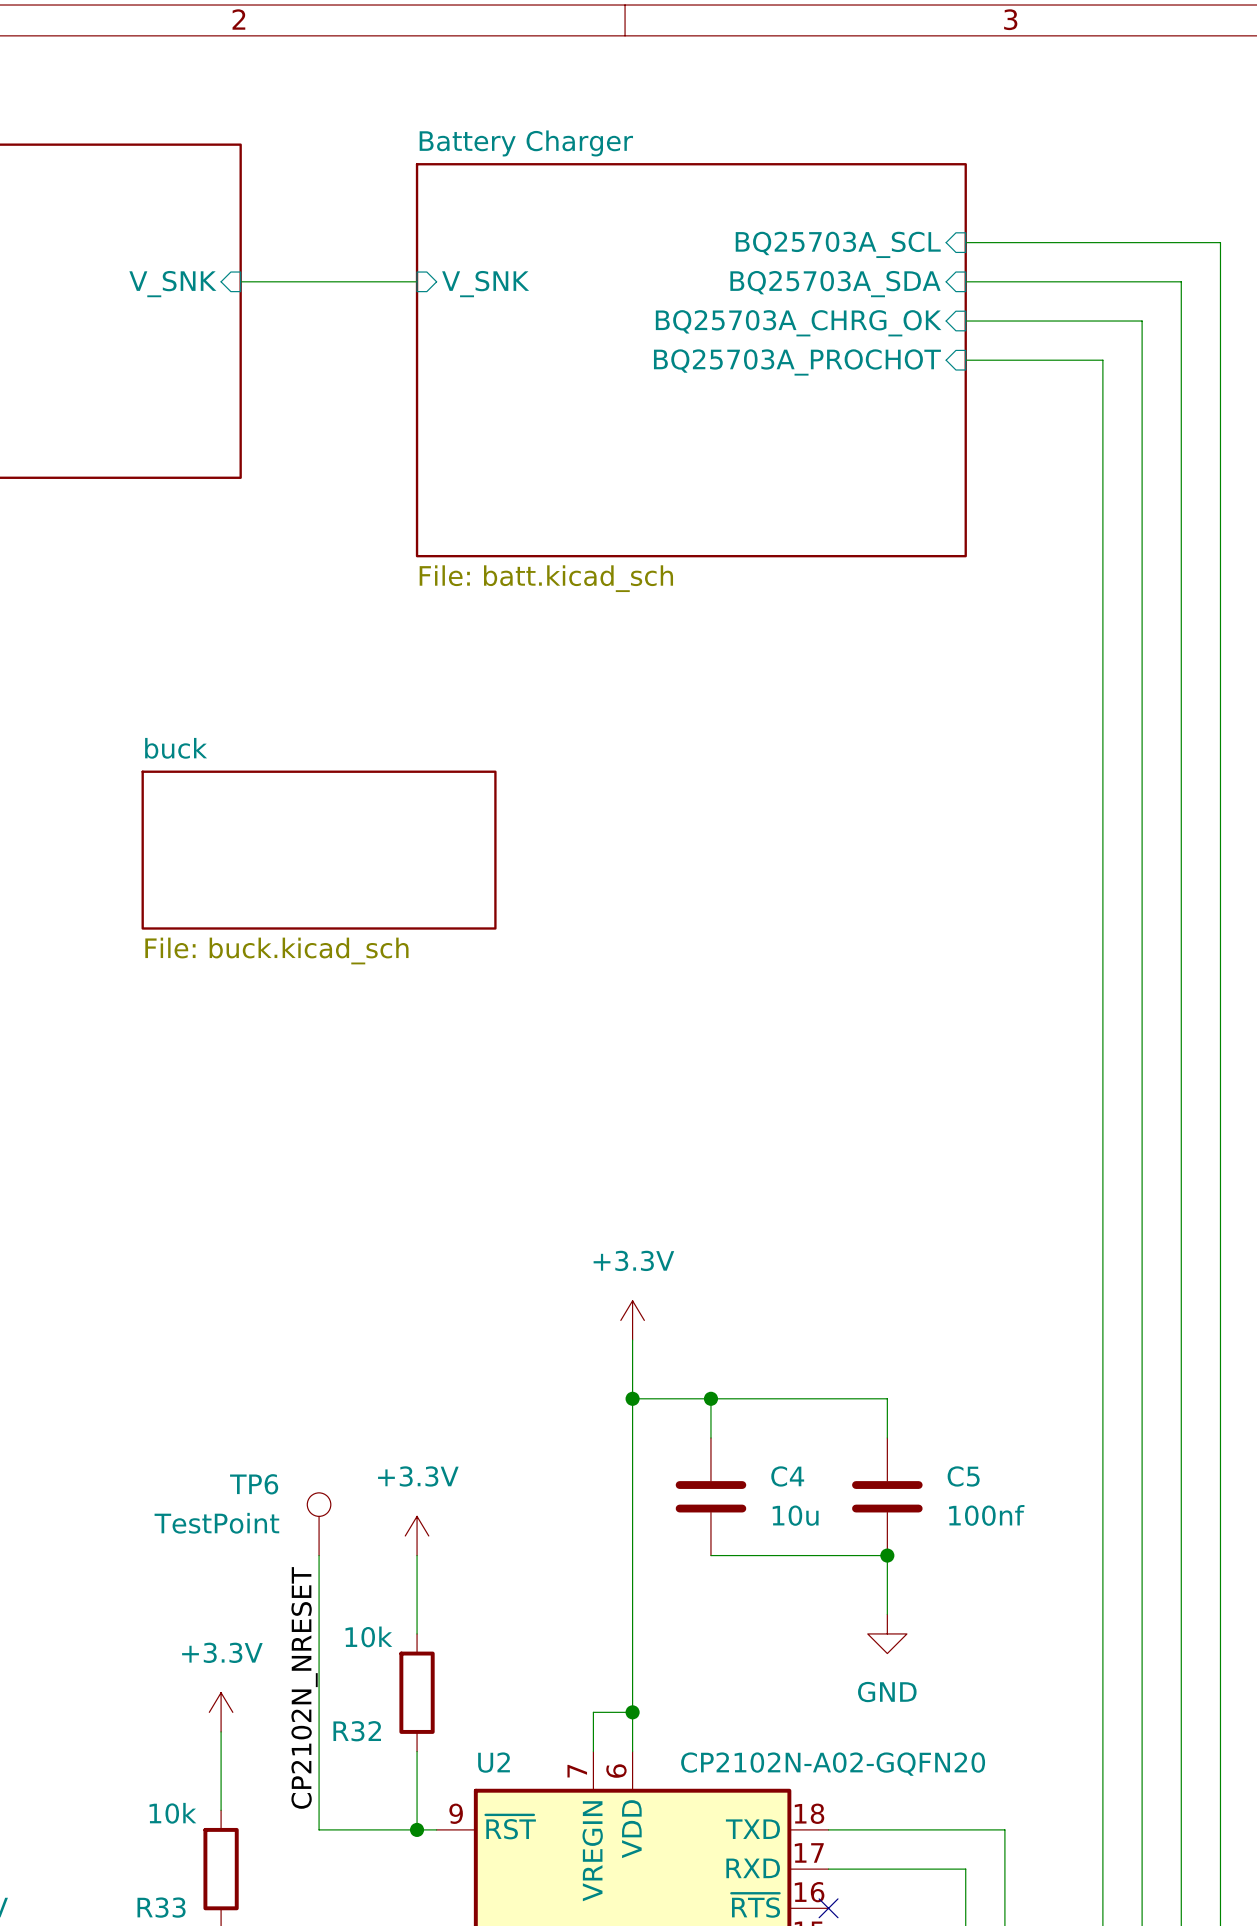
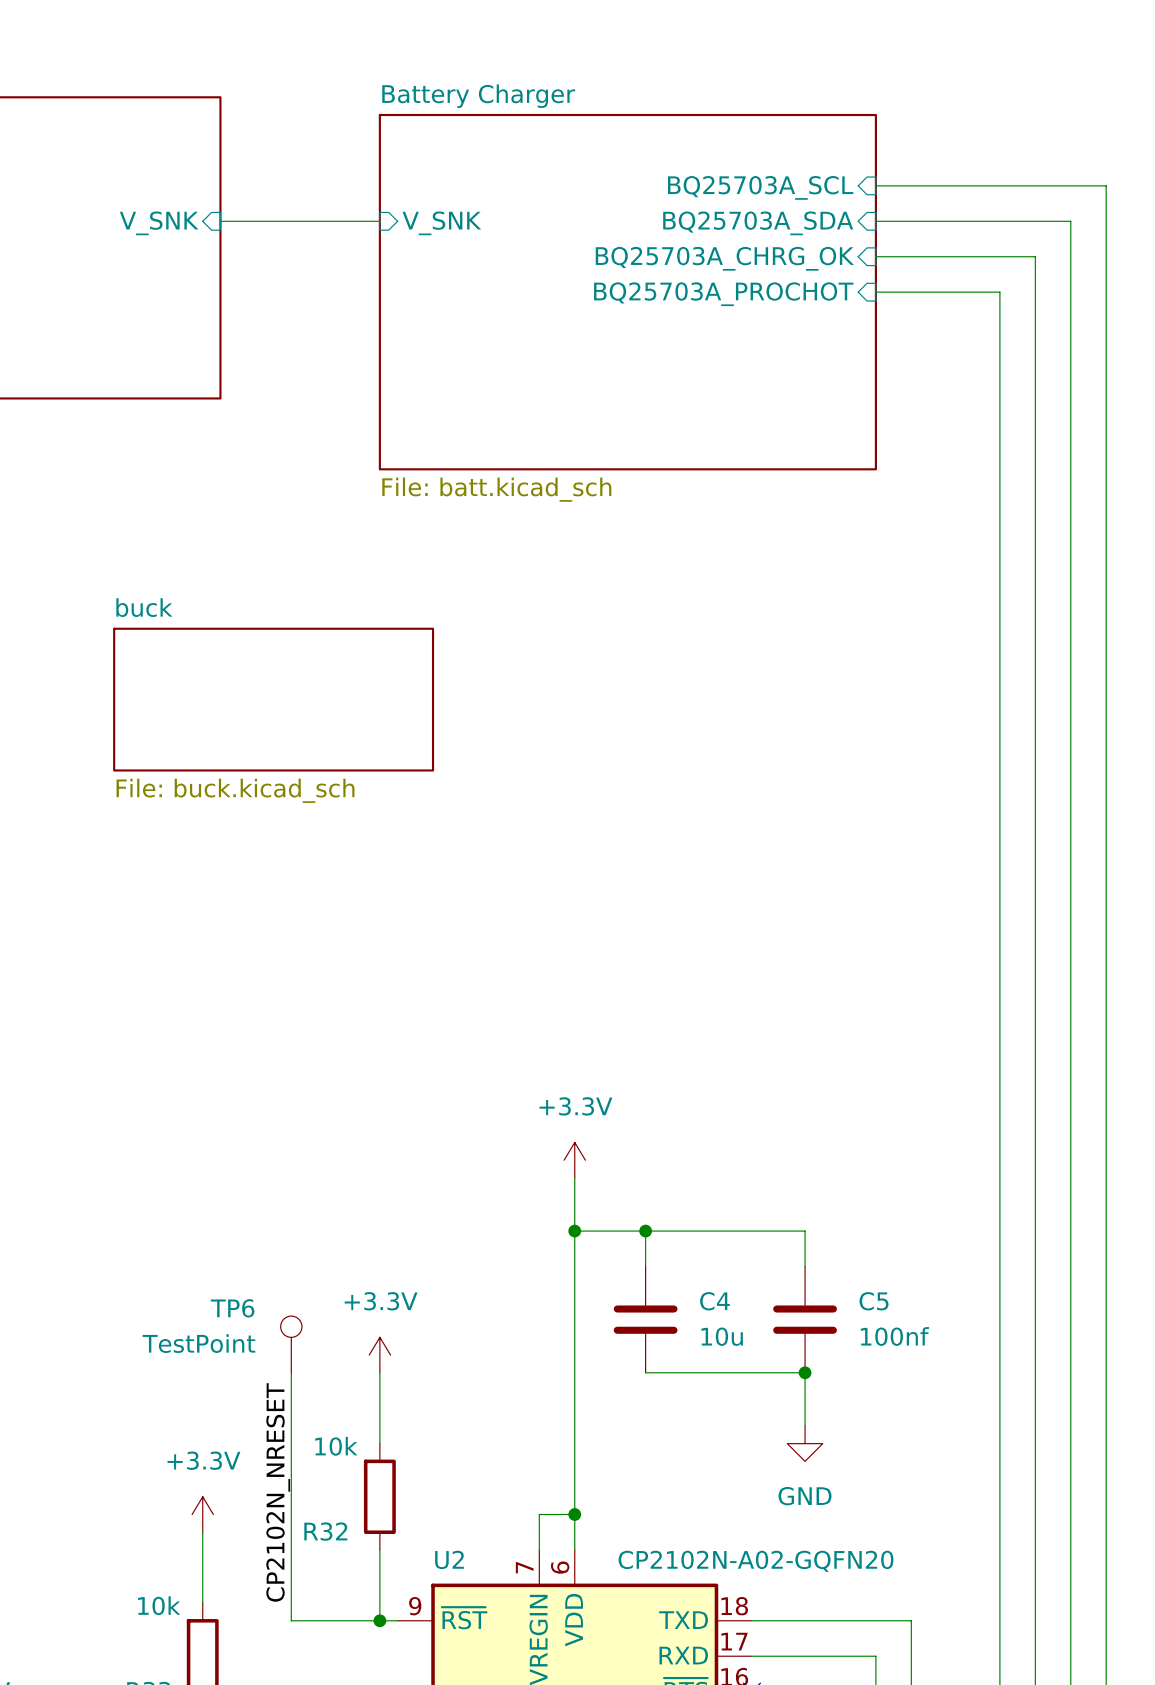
sheet buck position: (319, 850) -> (273, 699)

